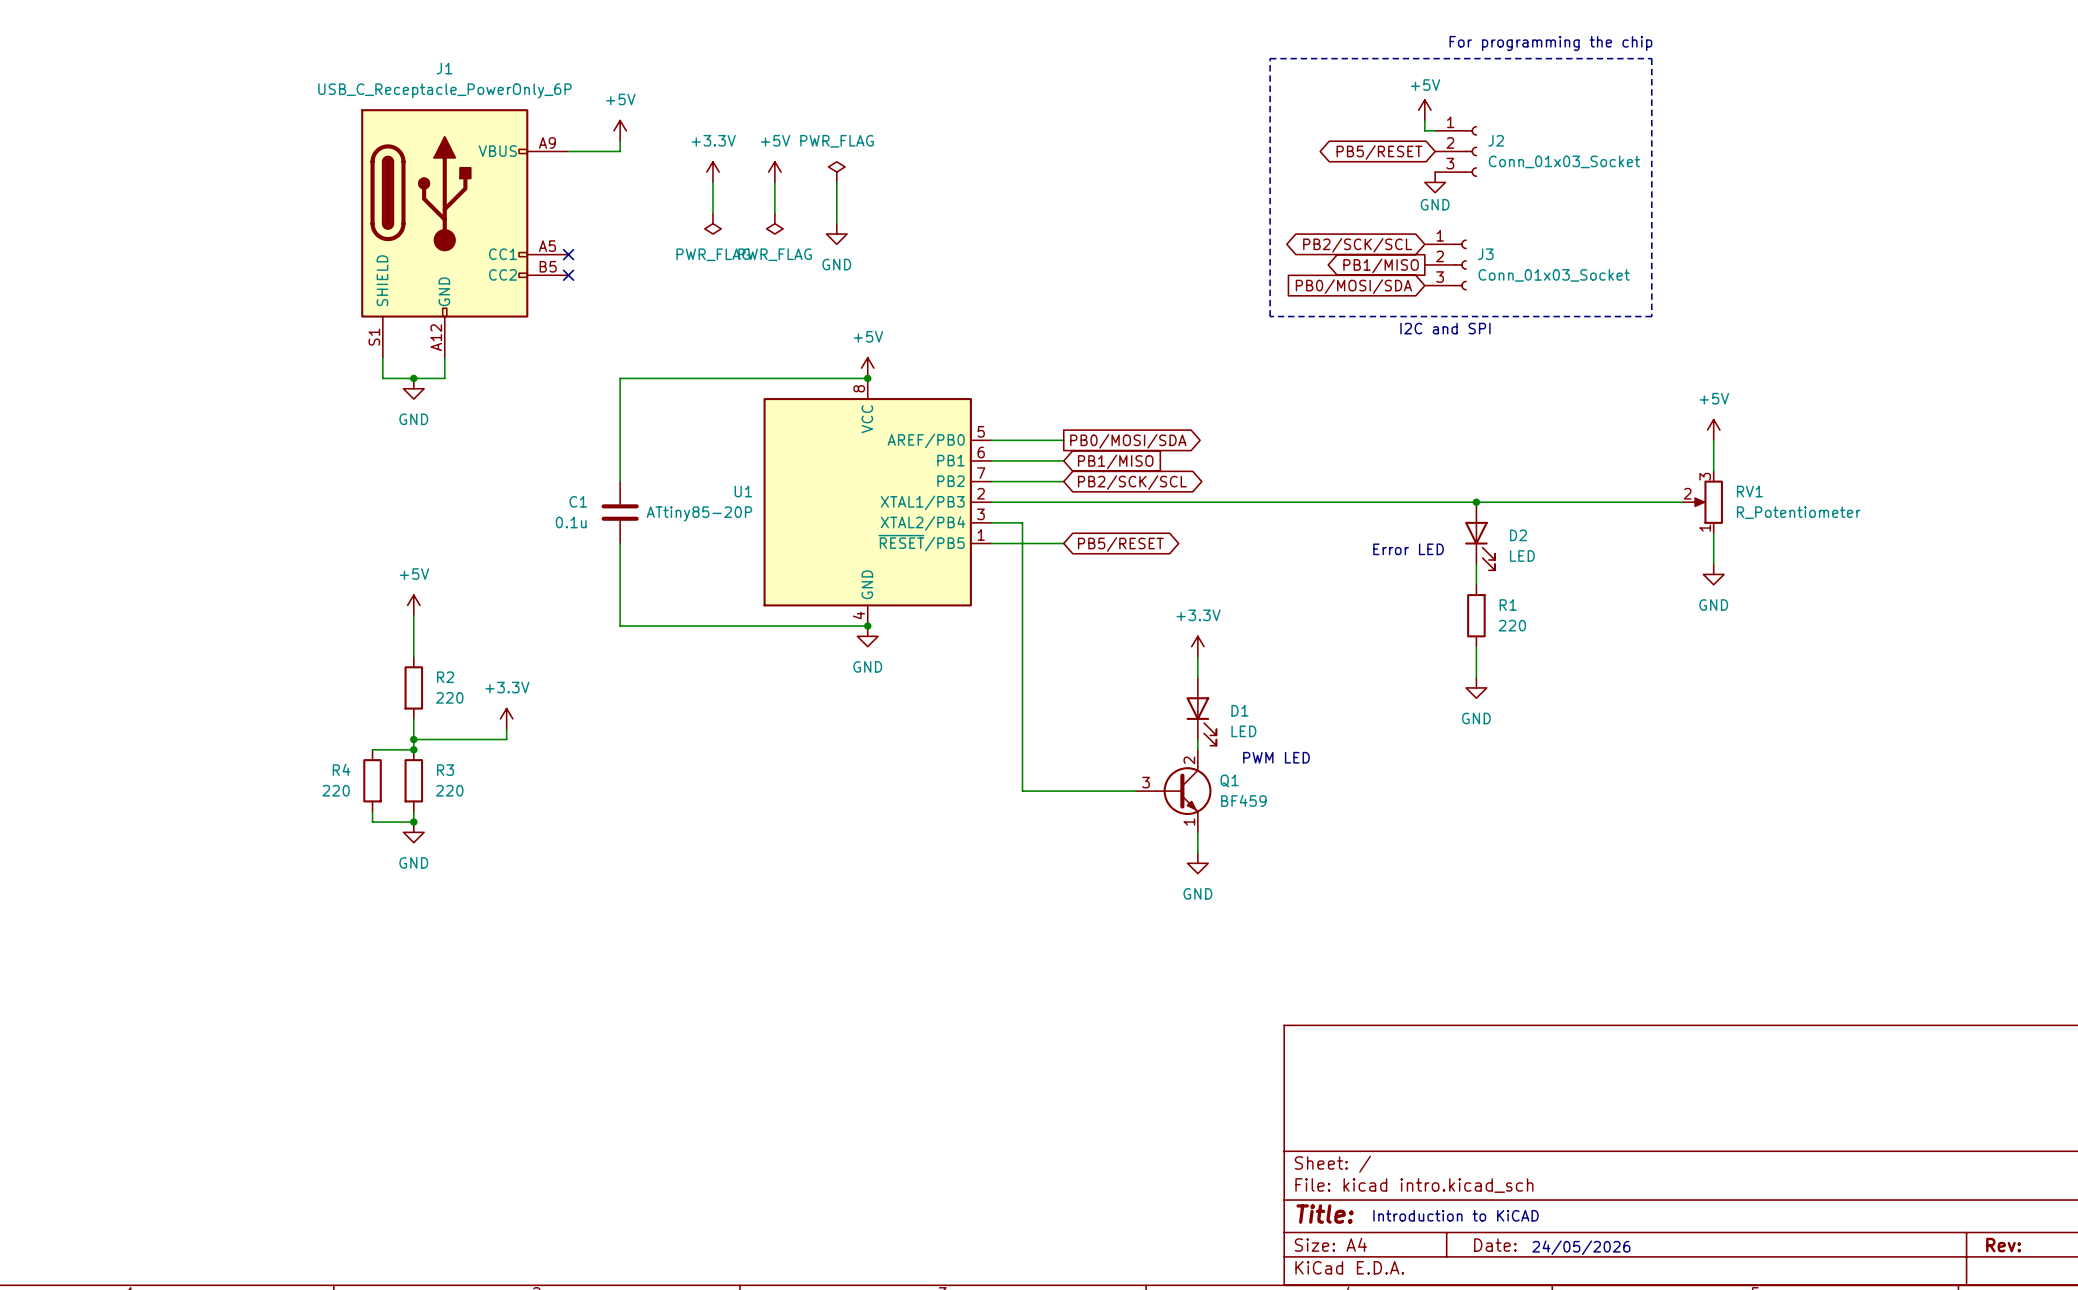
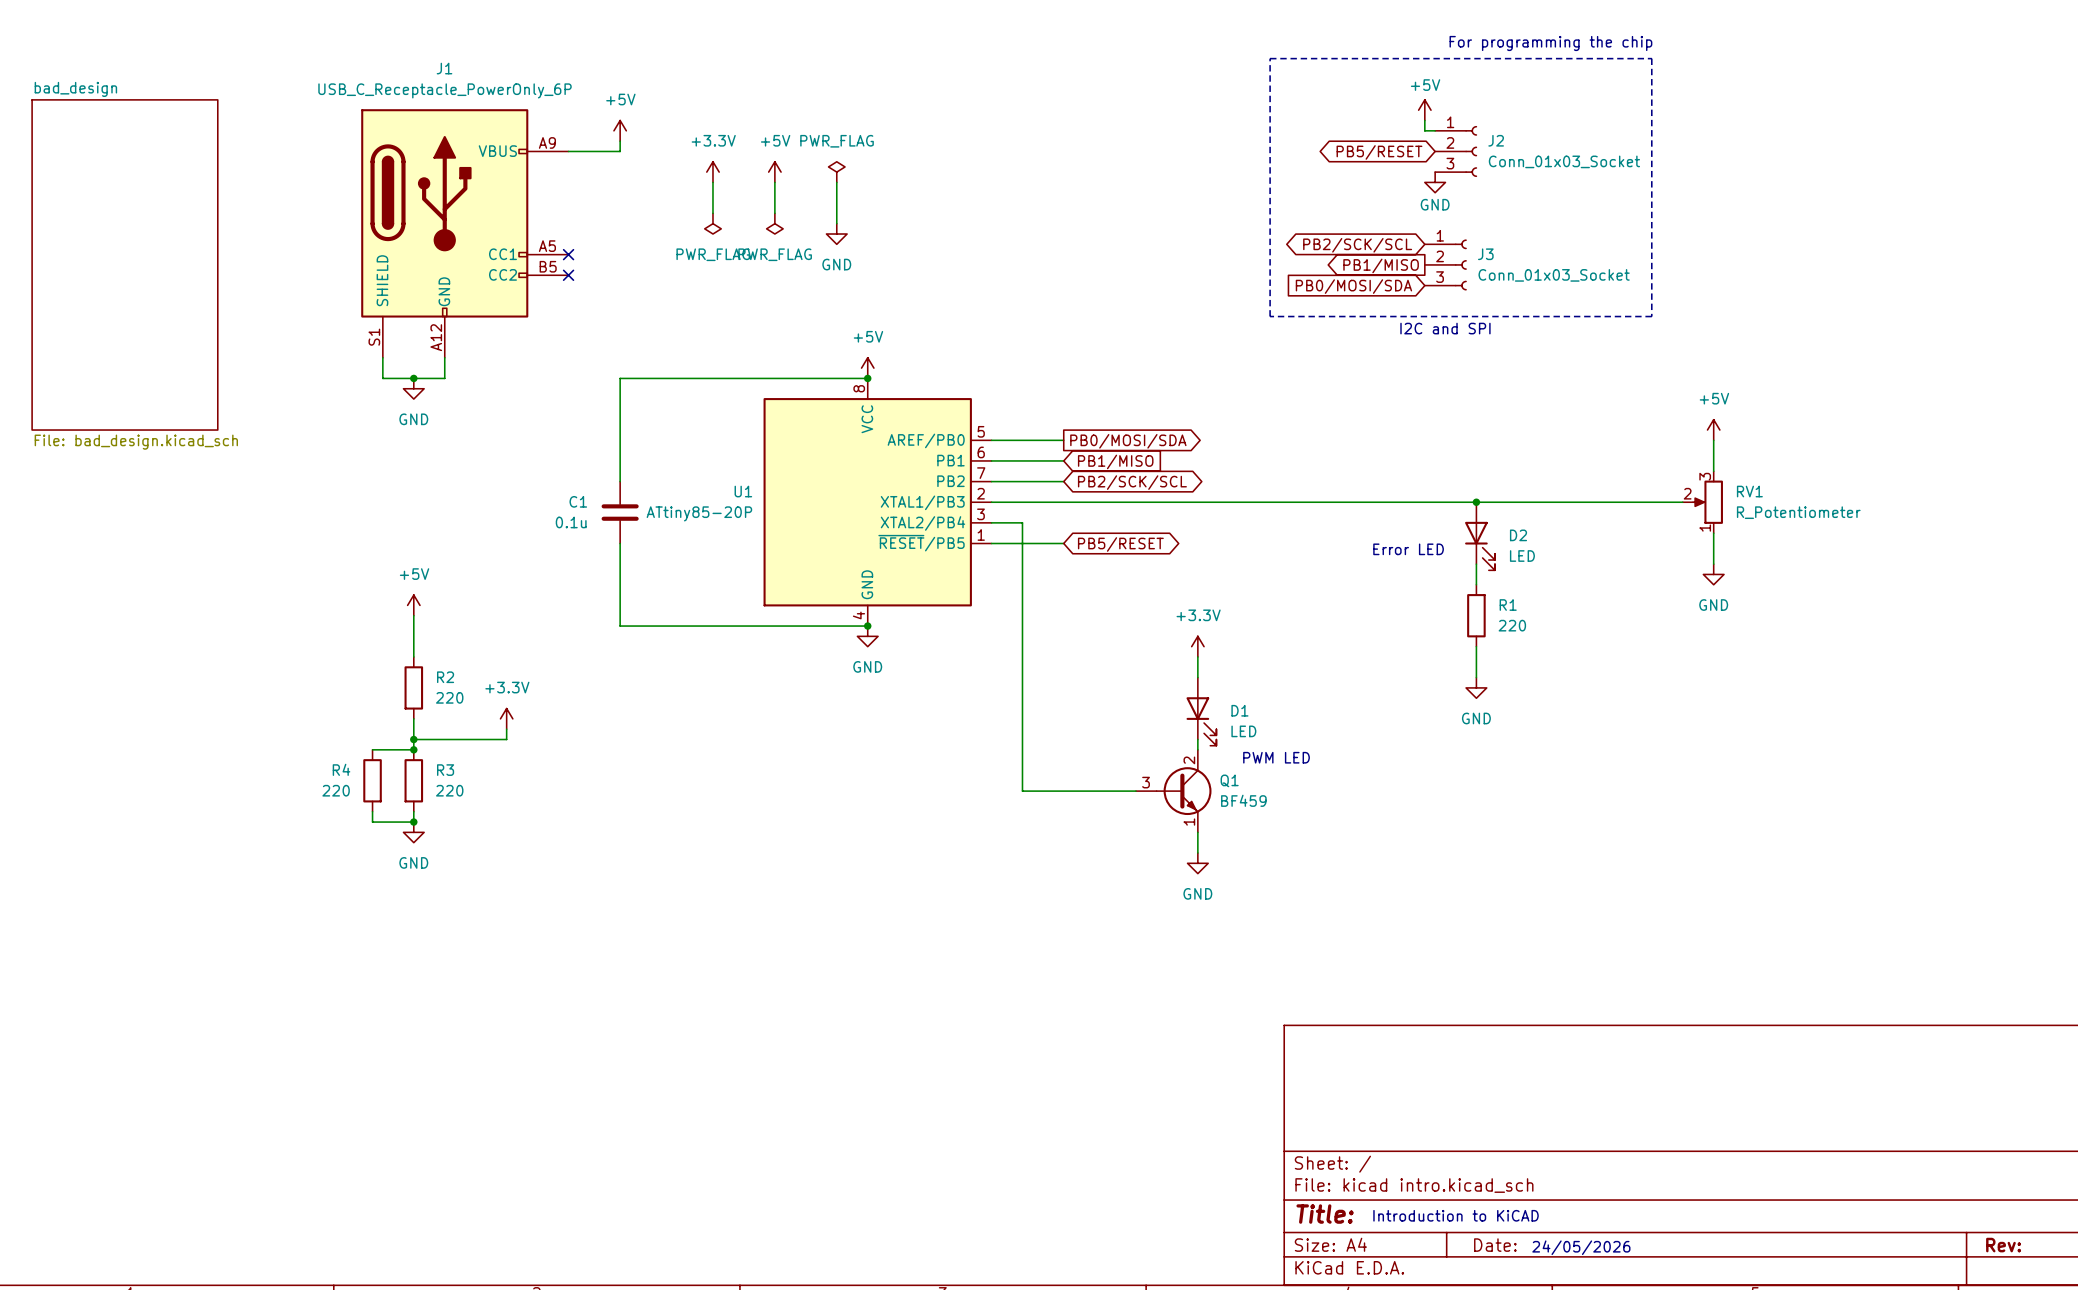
sheet bad_design: none -> File: bad_design.kicad_sch (124, 264)

